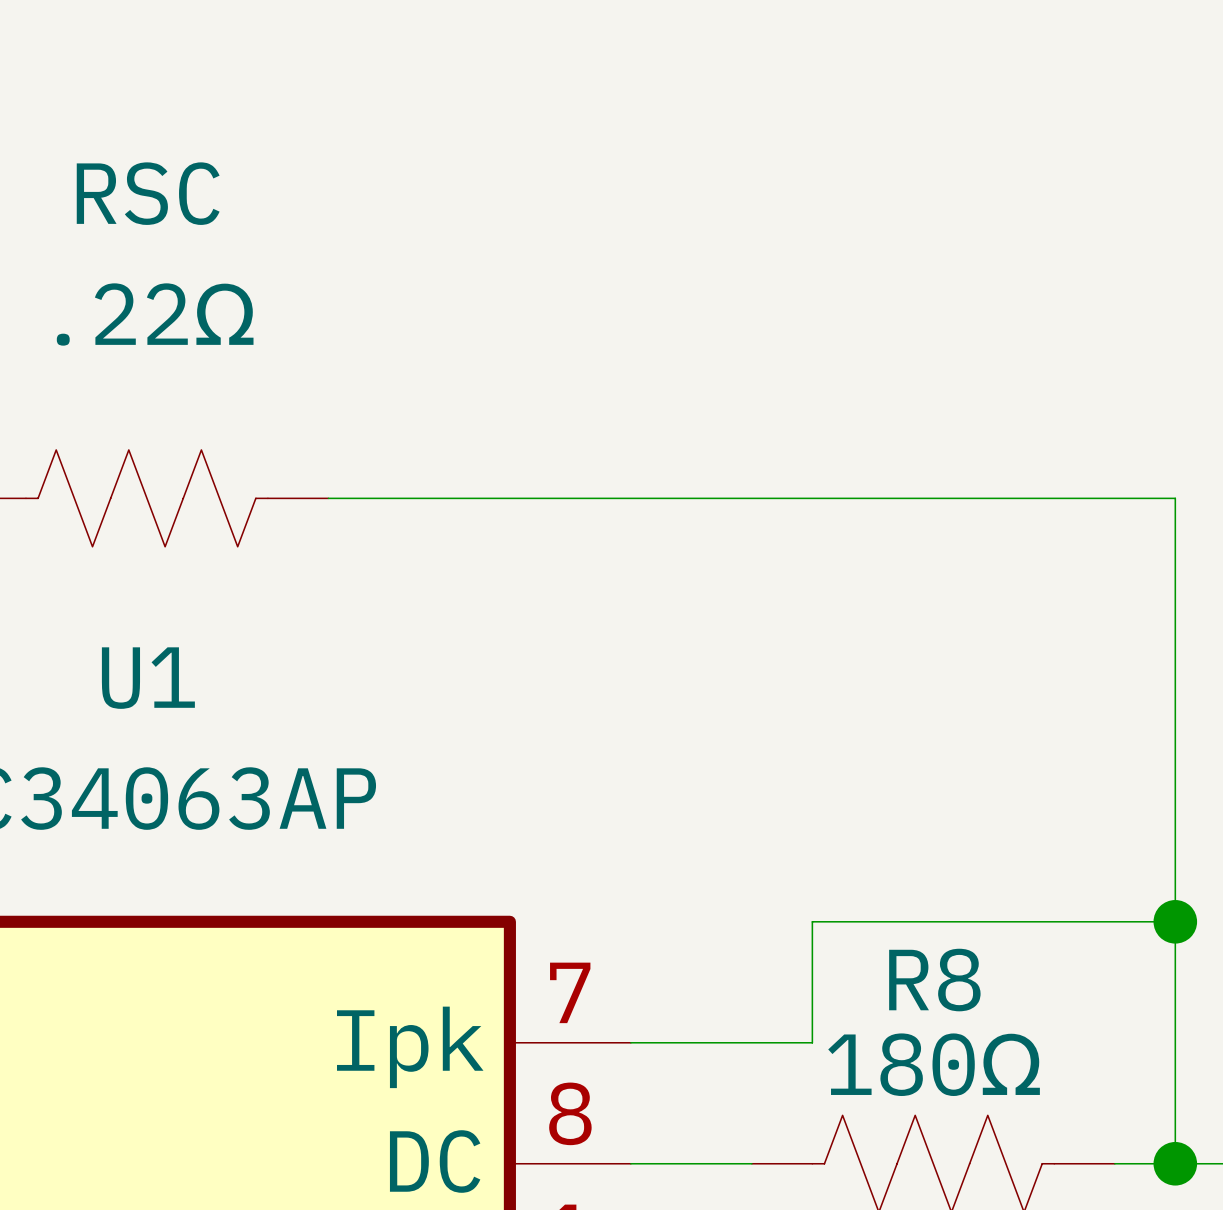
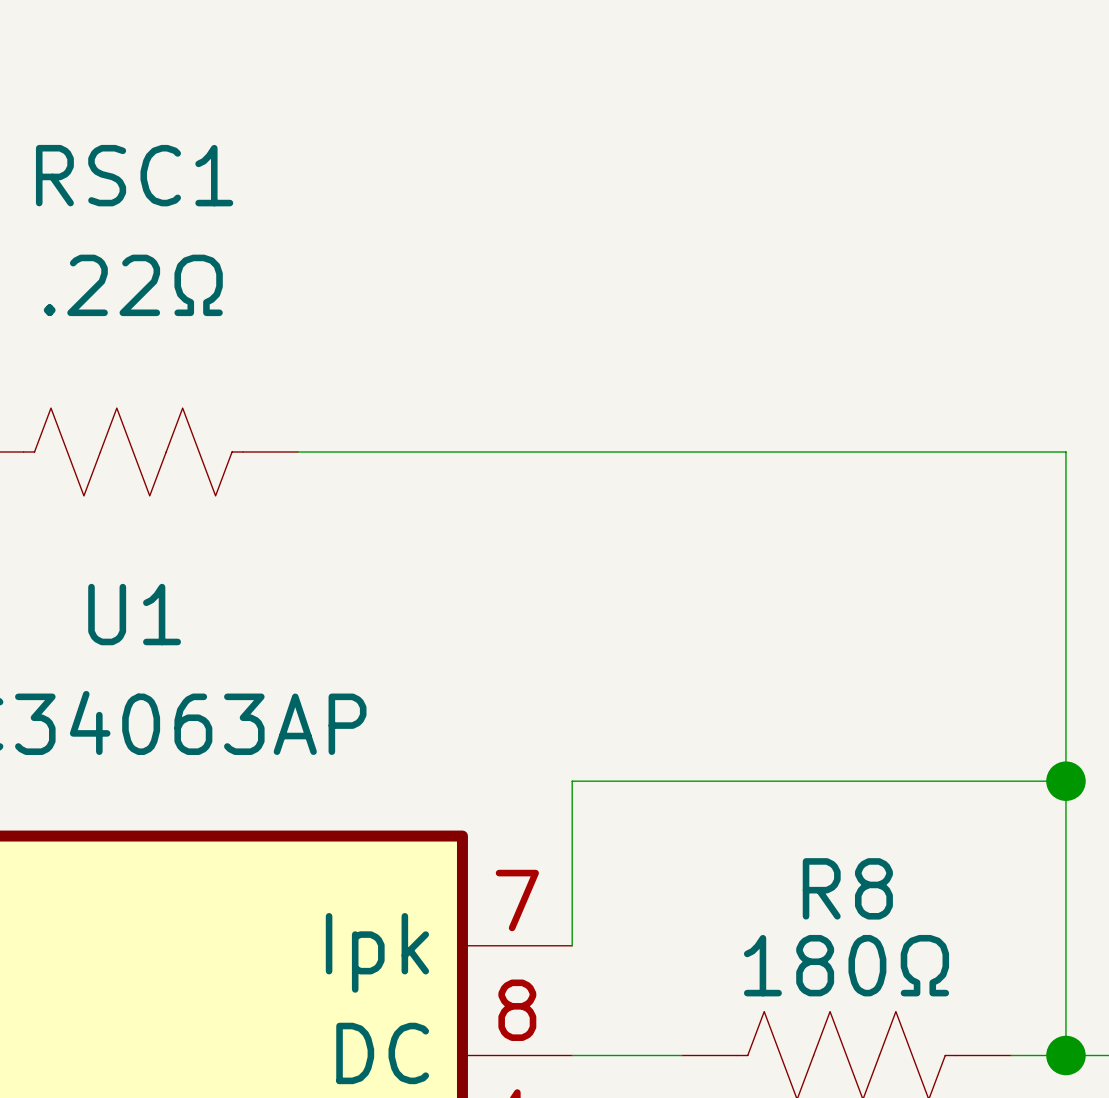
RSC name: RSC (148, 193) -> RSC1 (134, 175)
wire: (1175, 921) (812, 921) (812, 1042) (630, 1042) -> (1065, 781) (572, 781) (572, 945)
junction position: (1175, 921) -> (1065, 781)

